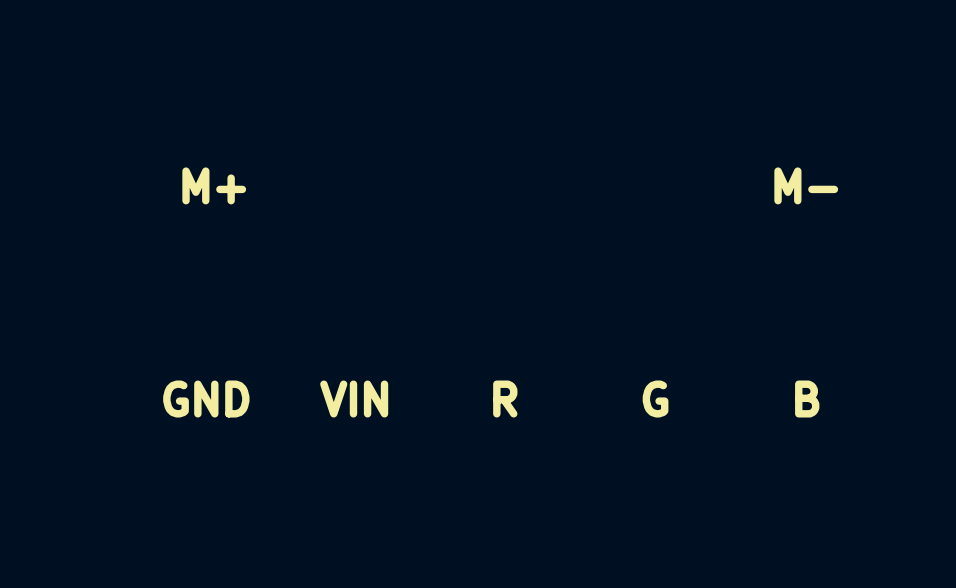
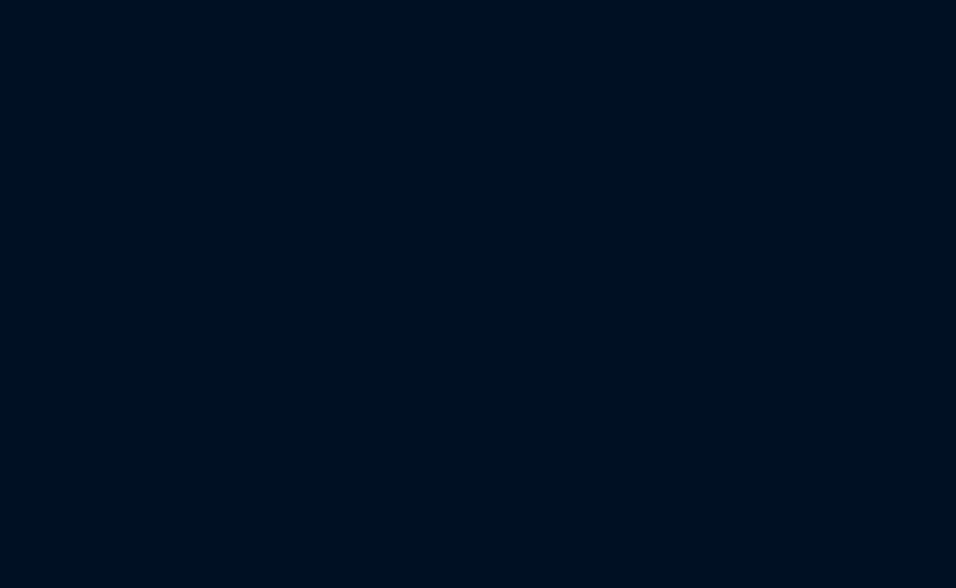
text: M+ (214, 185) -> none
text: M- (806, 185) -> none
text: GND (206, 399) -> none
text: VIN (354, 399) -> none
text: R (505, 399) -> none
text: G (655, 399) -> none
text: B (807, 399) -> none

